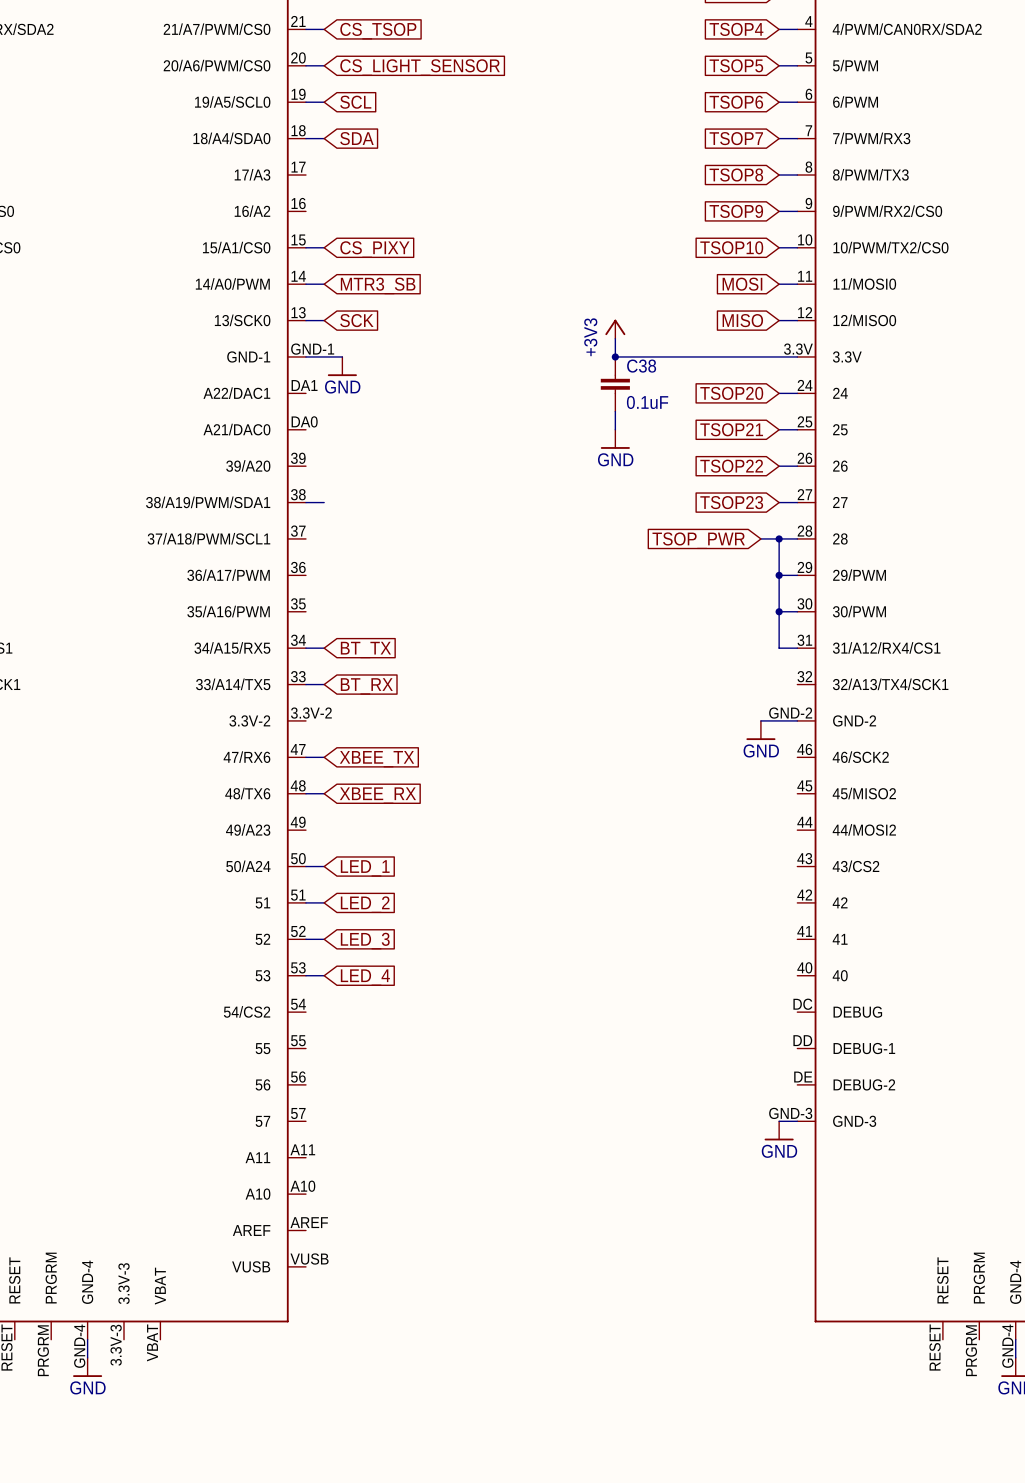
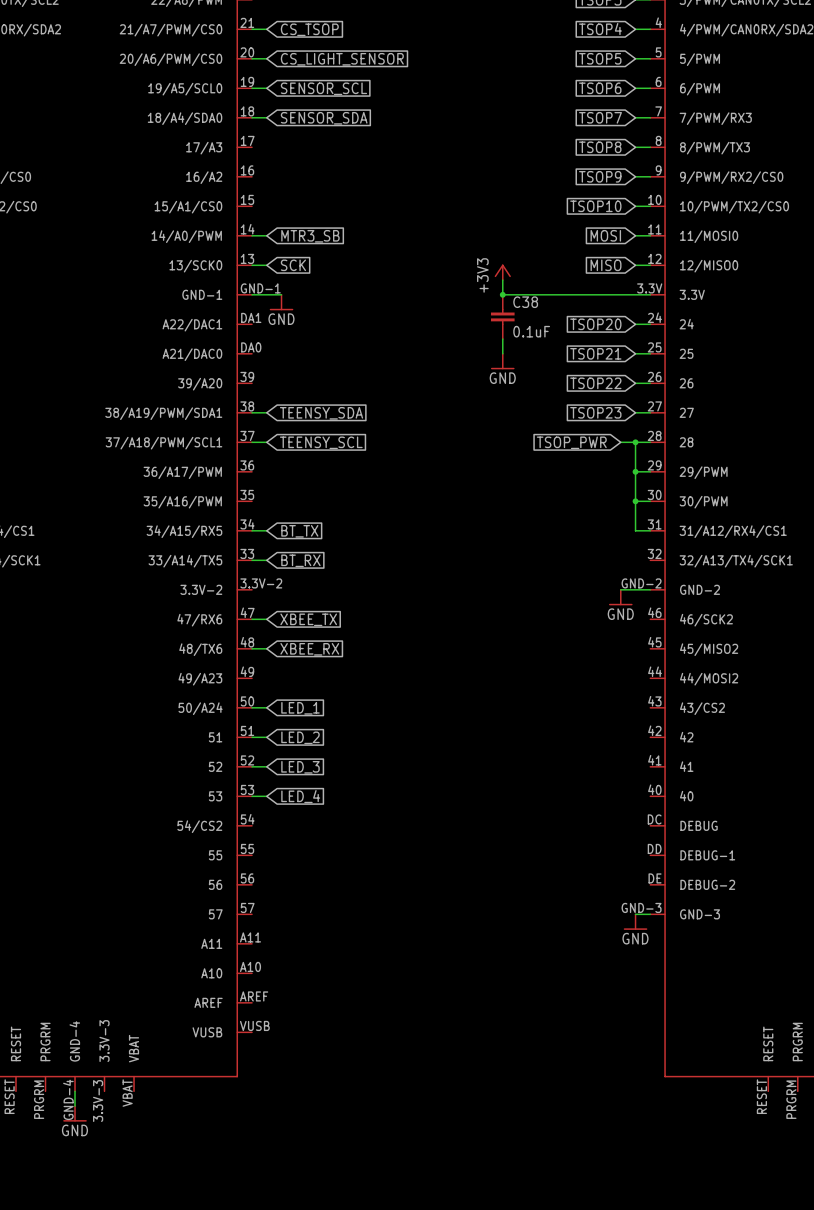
global label: SCL (355, 102) -> SENSOR_SCL (323, 88)
global label: SDA (356, 138) -> SENSOR_SDA (324, 118)
wire: (305, 247) (324, 247) -> none
global label: CS_PIXY (374, 249) -> none
global label: none -> TEENSY_SDA (321, 413)
wire: none -> (252, 442) (266, 442)
global label: none -> TEENSY_SCL (321, 442)

